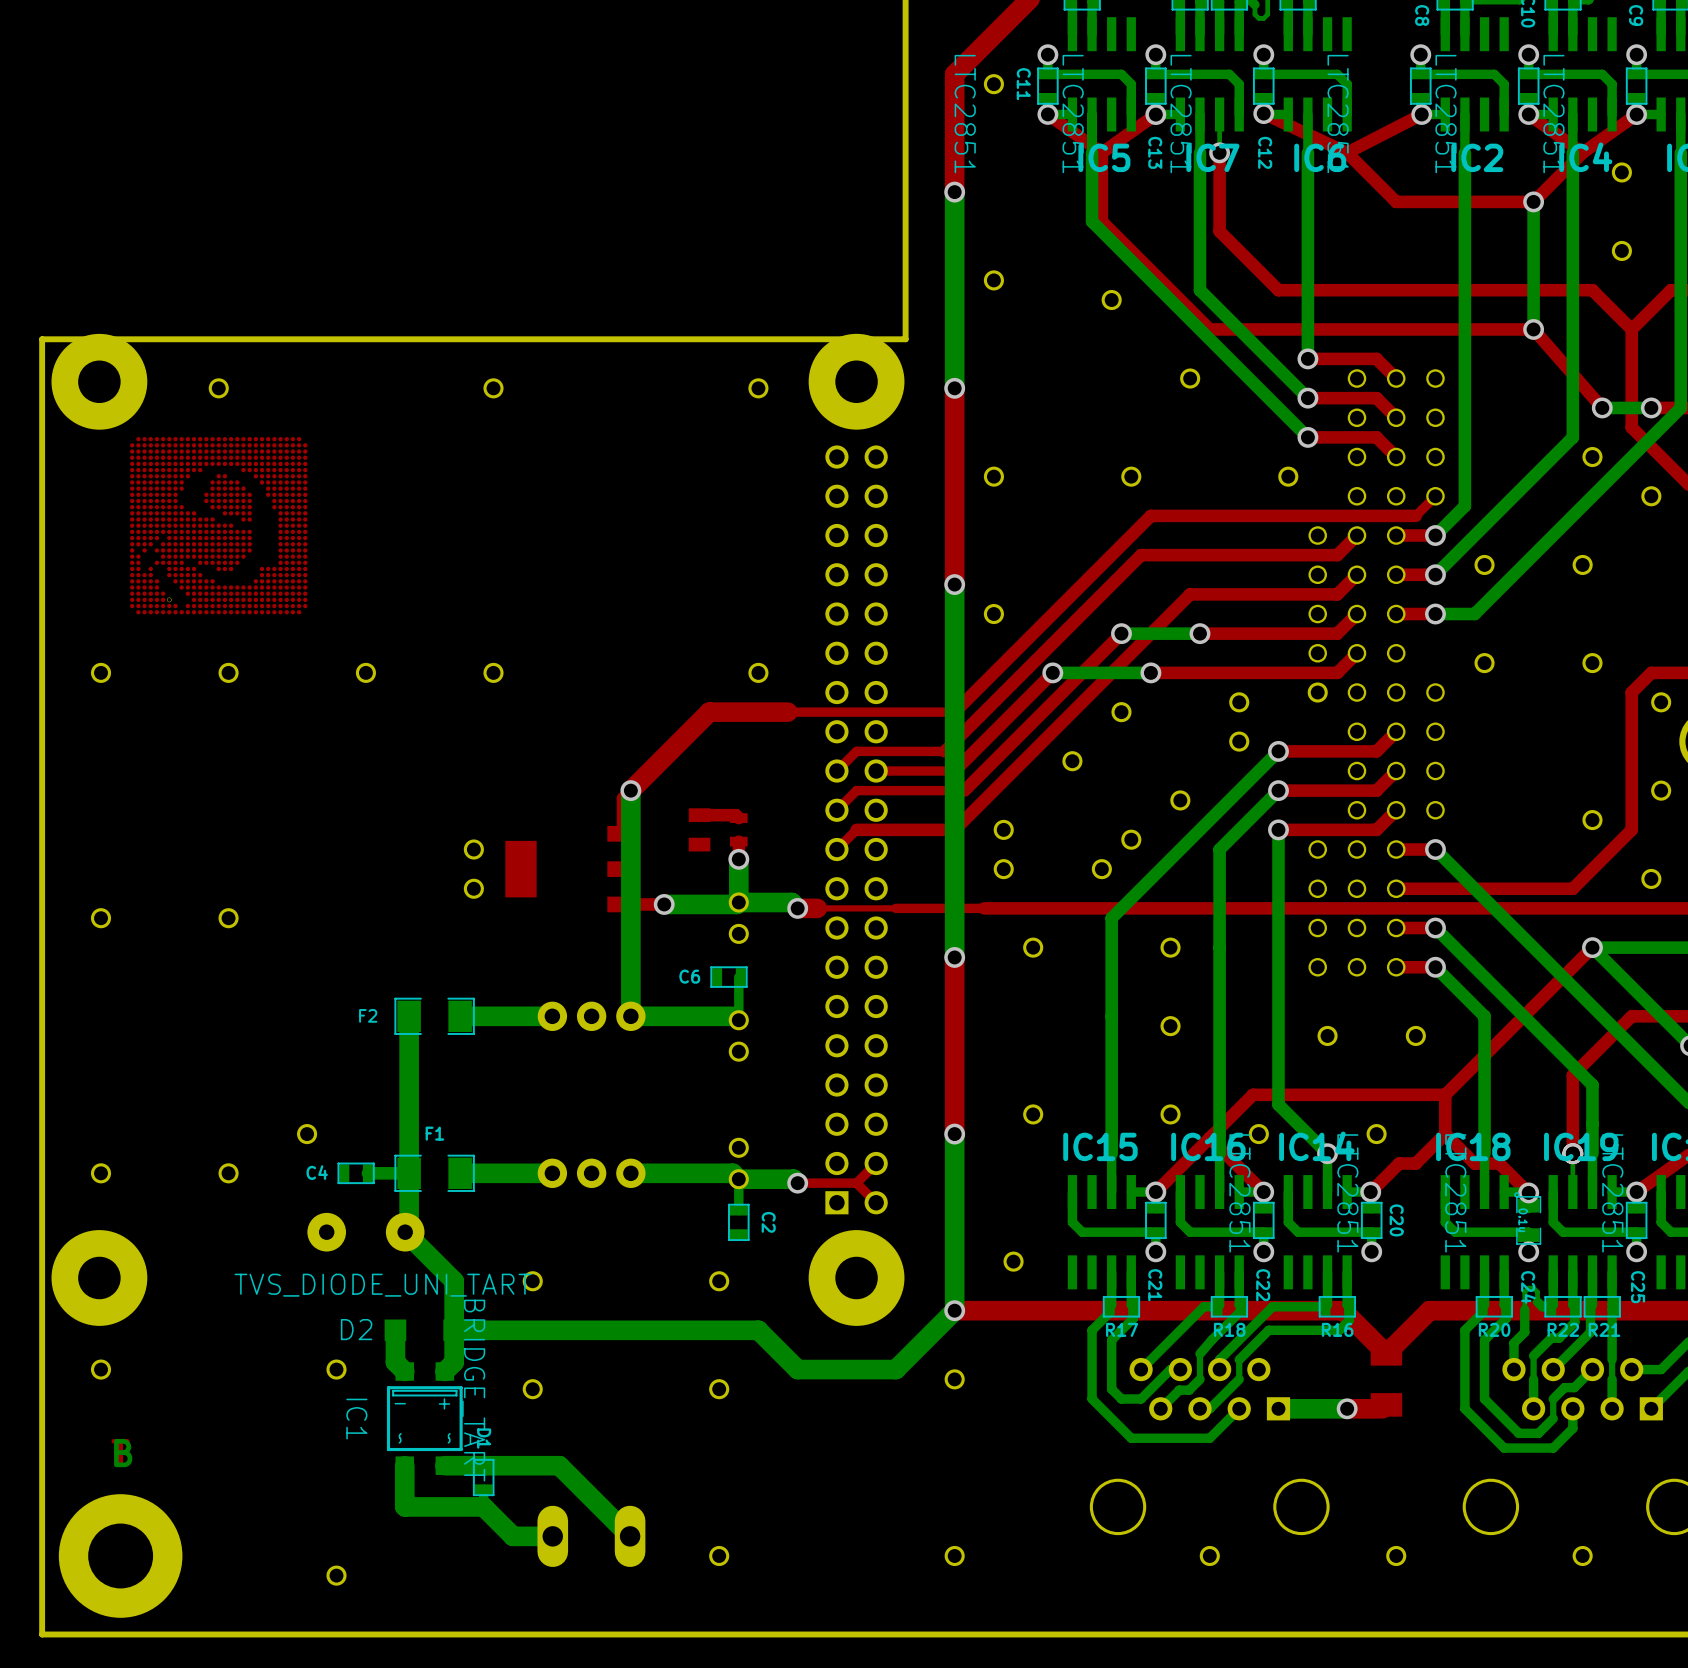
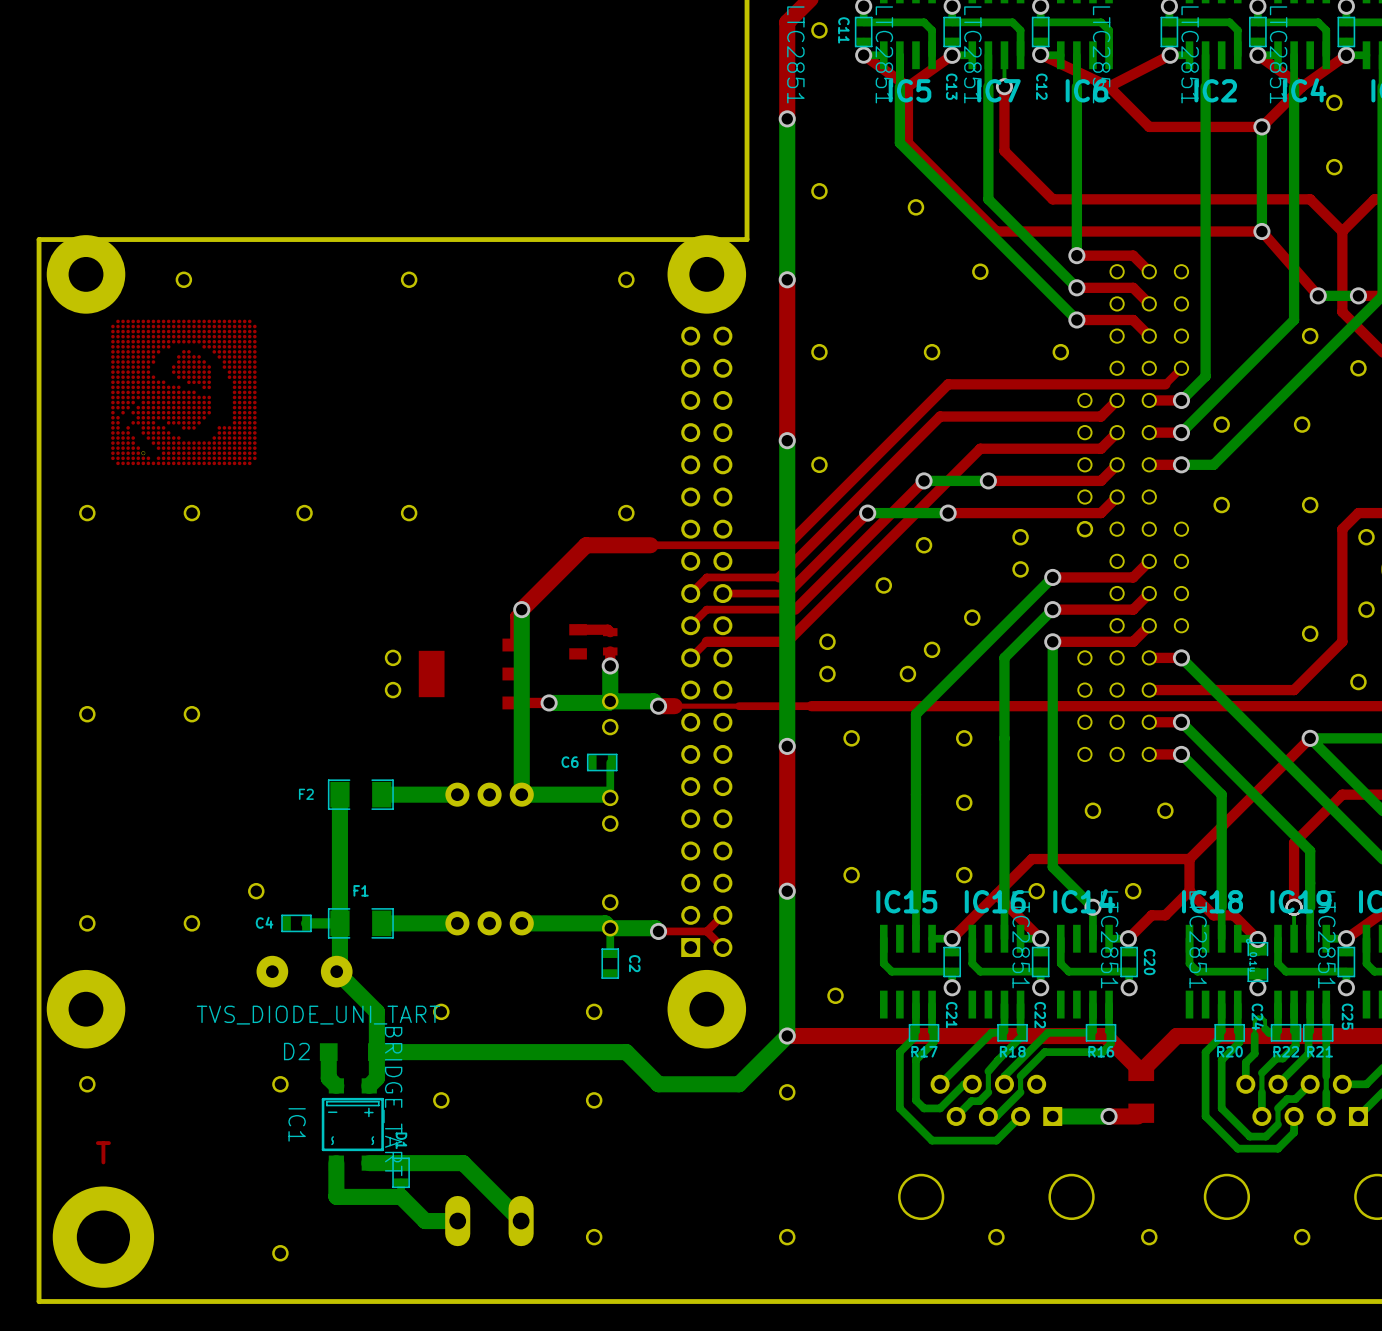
text: B (123, 1453) -> none

